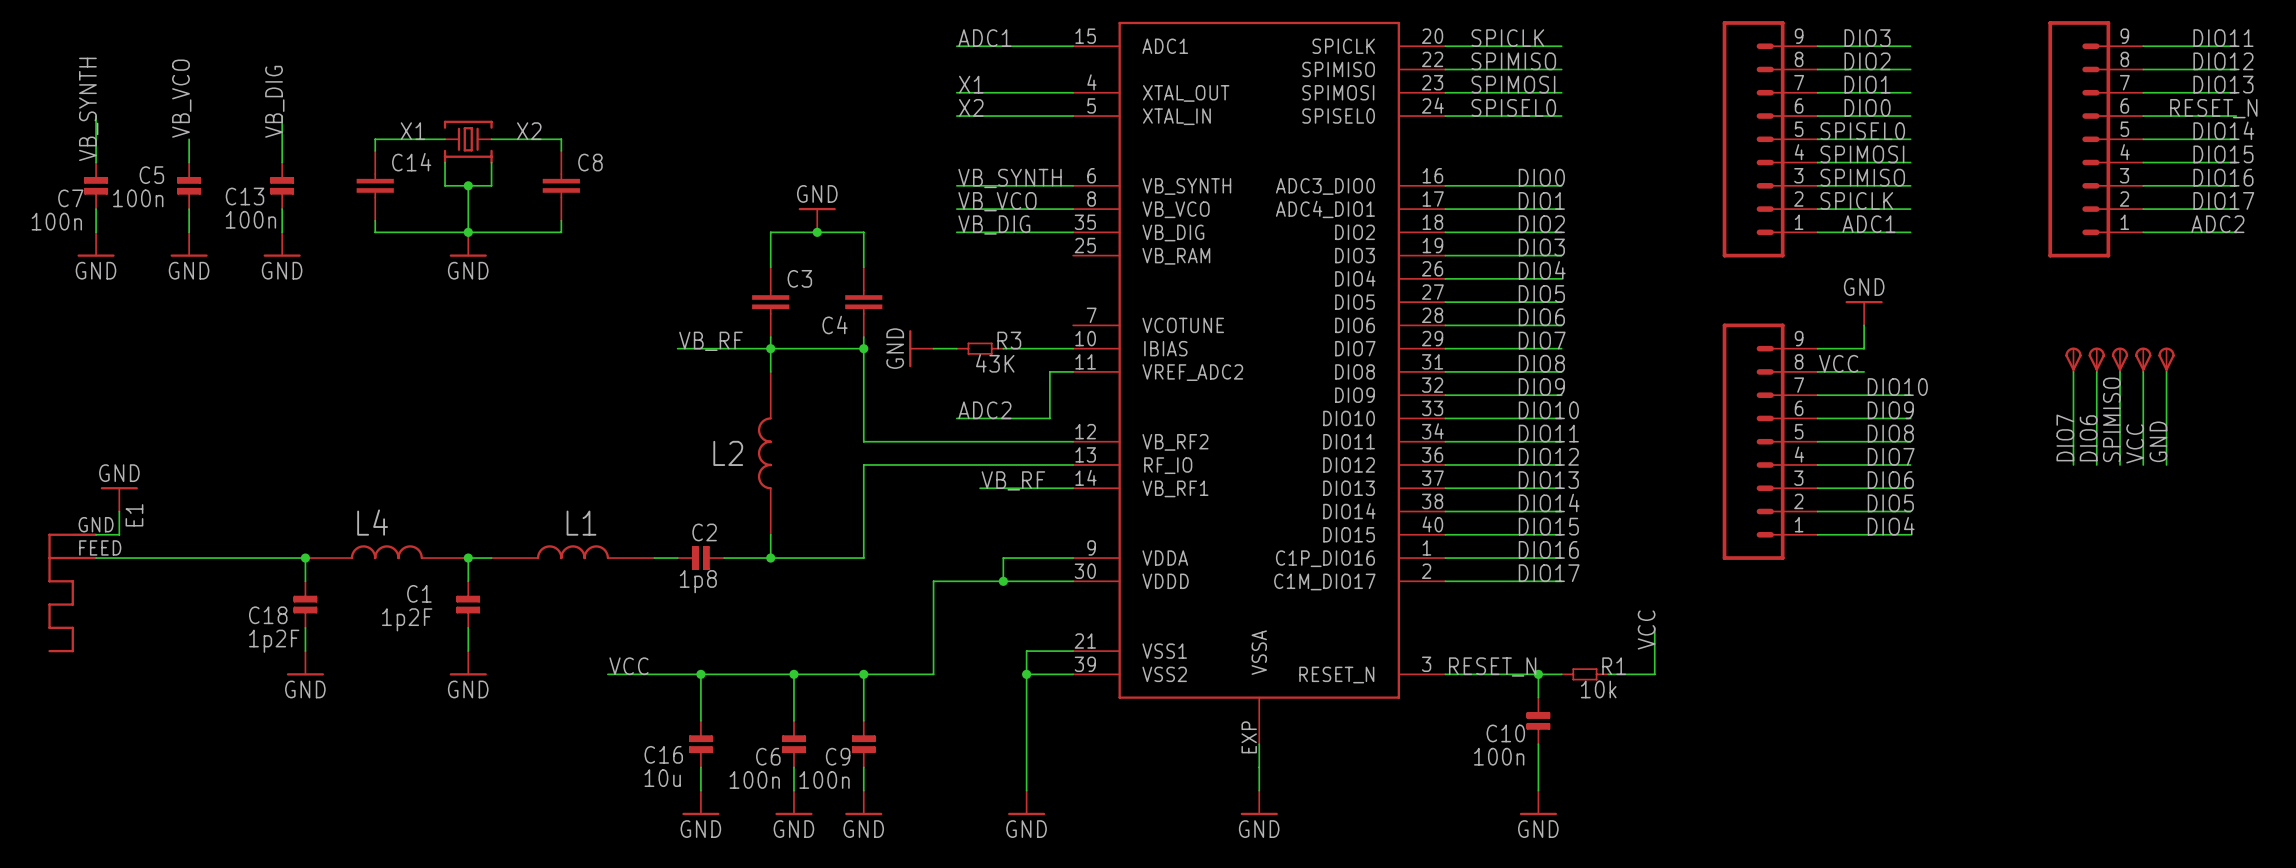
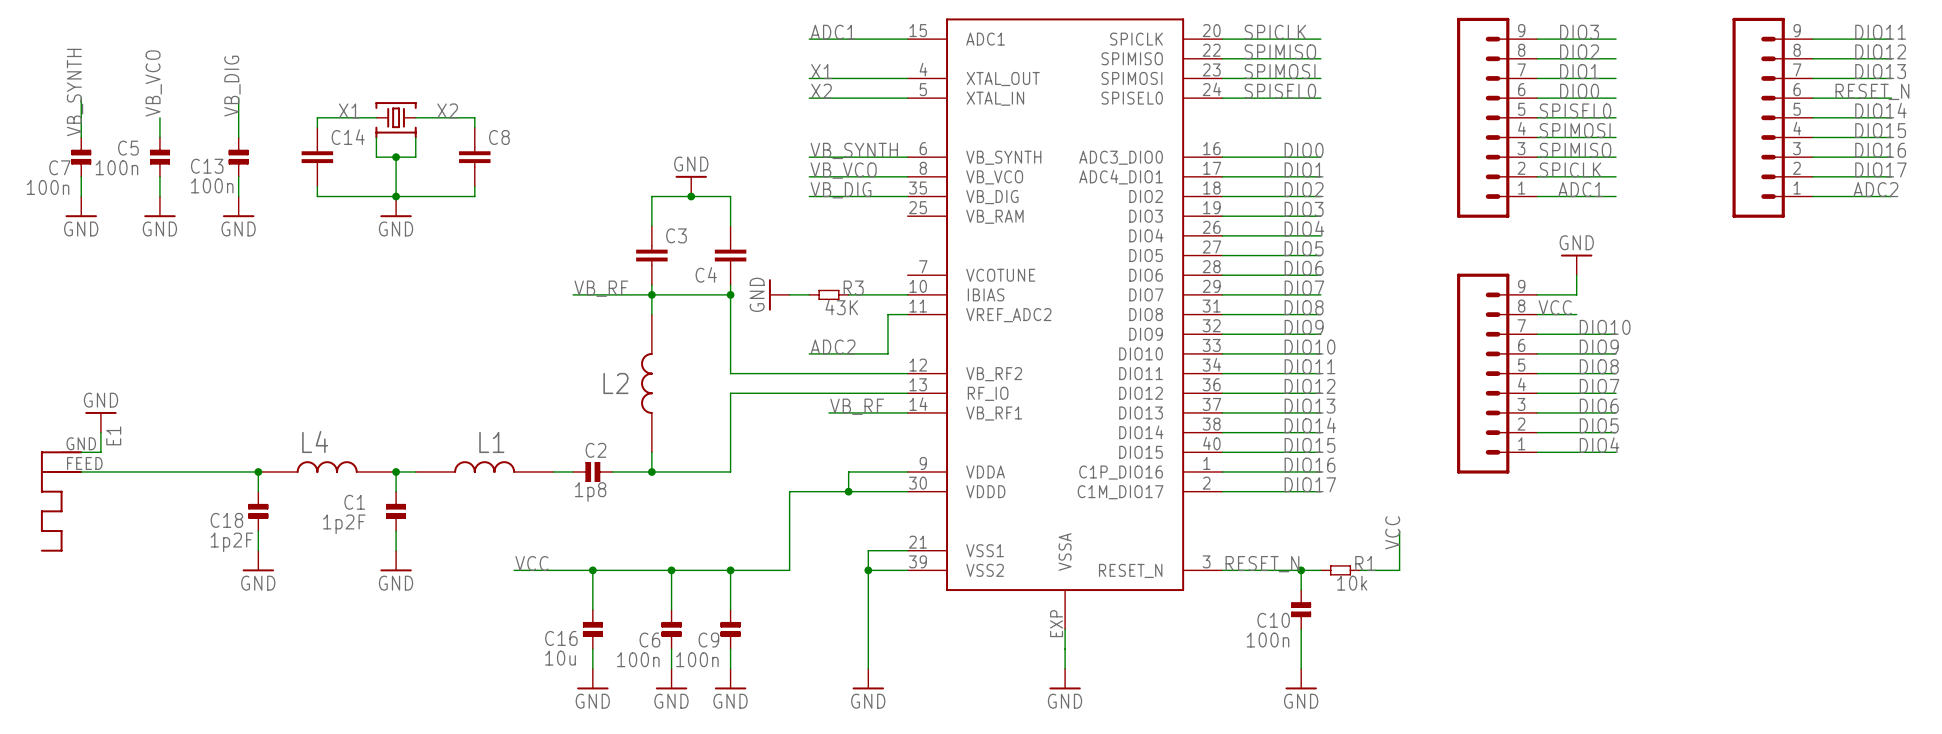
part: (2073, 359) -> none
part: (2096, 359) -> none
part: (2120, 359) -> none
part: (2143, 359) -> none
part: (2166, 359) -> none
wire: (2073, 371) (2073, 464) -> none
wire: (2096, 371) (2096, 464) -> none
wire: (2120, 371) (2120, 464) -> none
wire: (2143, 371) (2143, 464) -> none
wire: (2166, 371) (2166, 464) -> none
label: SPIMISO (2111, 419) -> none
label: DIO7 (2065, 437) -> none
label: DIO6 (2088, 438) -> none
label: GND (2158, 441) -> none
label: VCC (2135, 443) -> none

